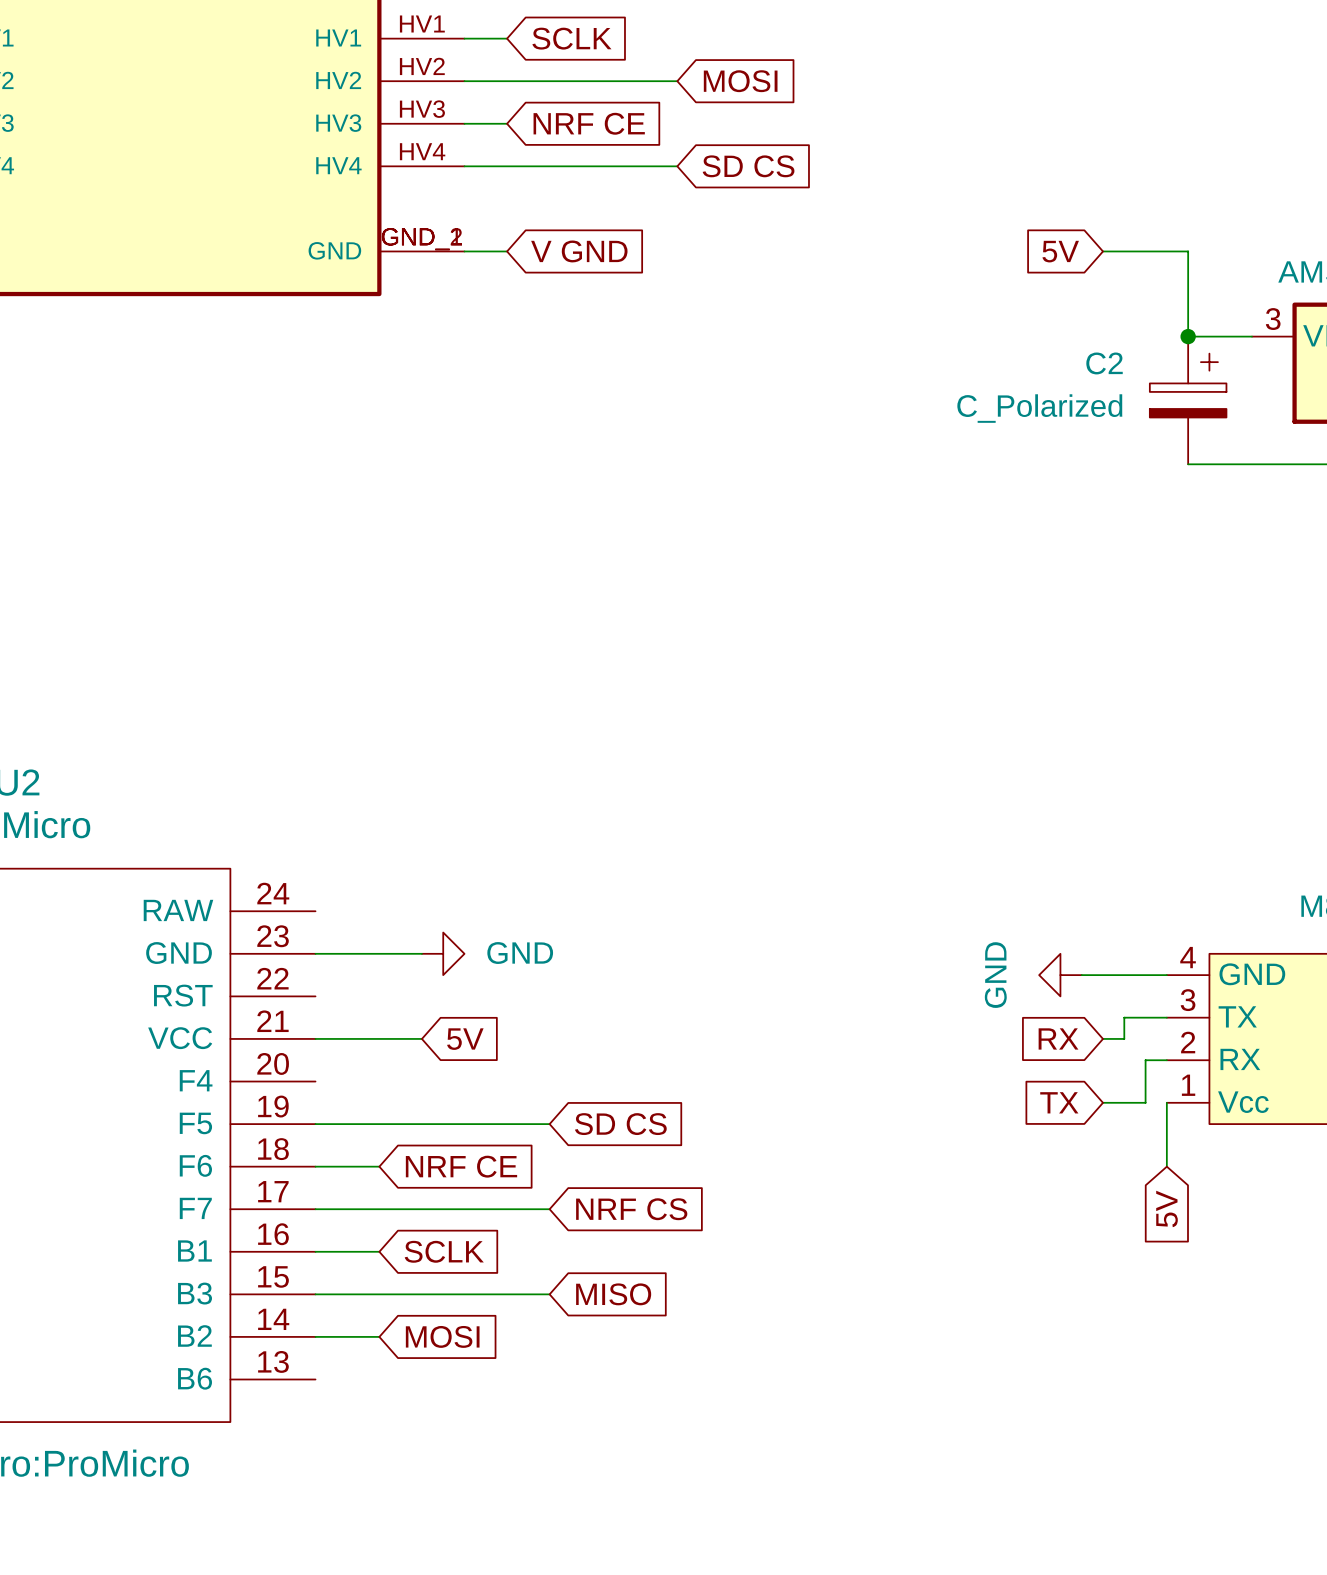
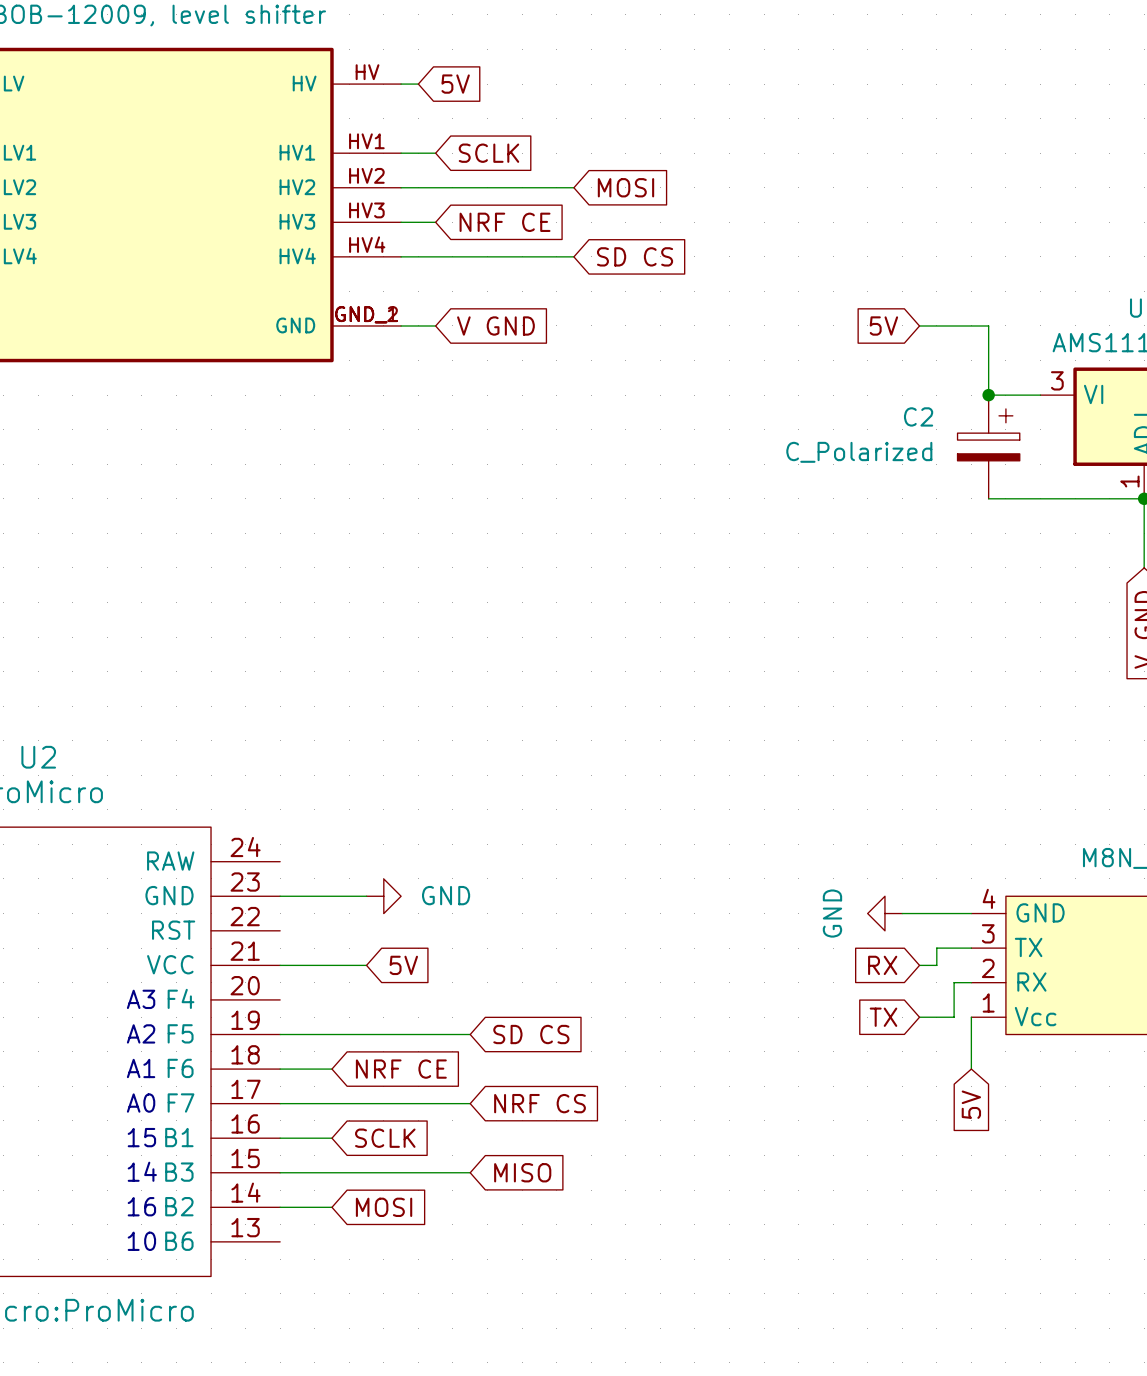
text: none -> A3 (141, 999)
text: none -> A2 (141, 1033)
text: none -> A1 (141, 1068)
text: none -> A0 (141, 1103)
text: none -> 15 (141, 1137)
text: none -> 14 (142, 1171)
text: none -> 16 (141, 1206)
text: none -> 10 (141, 1241)

